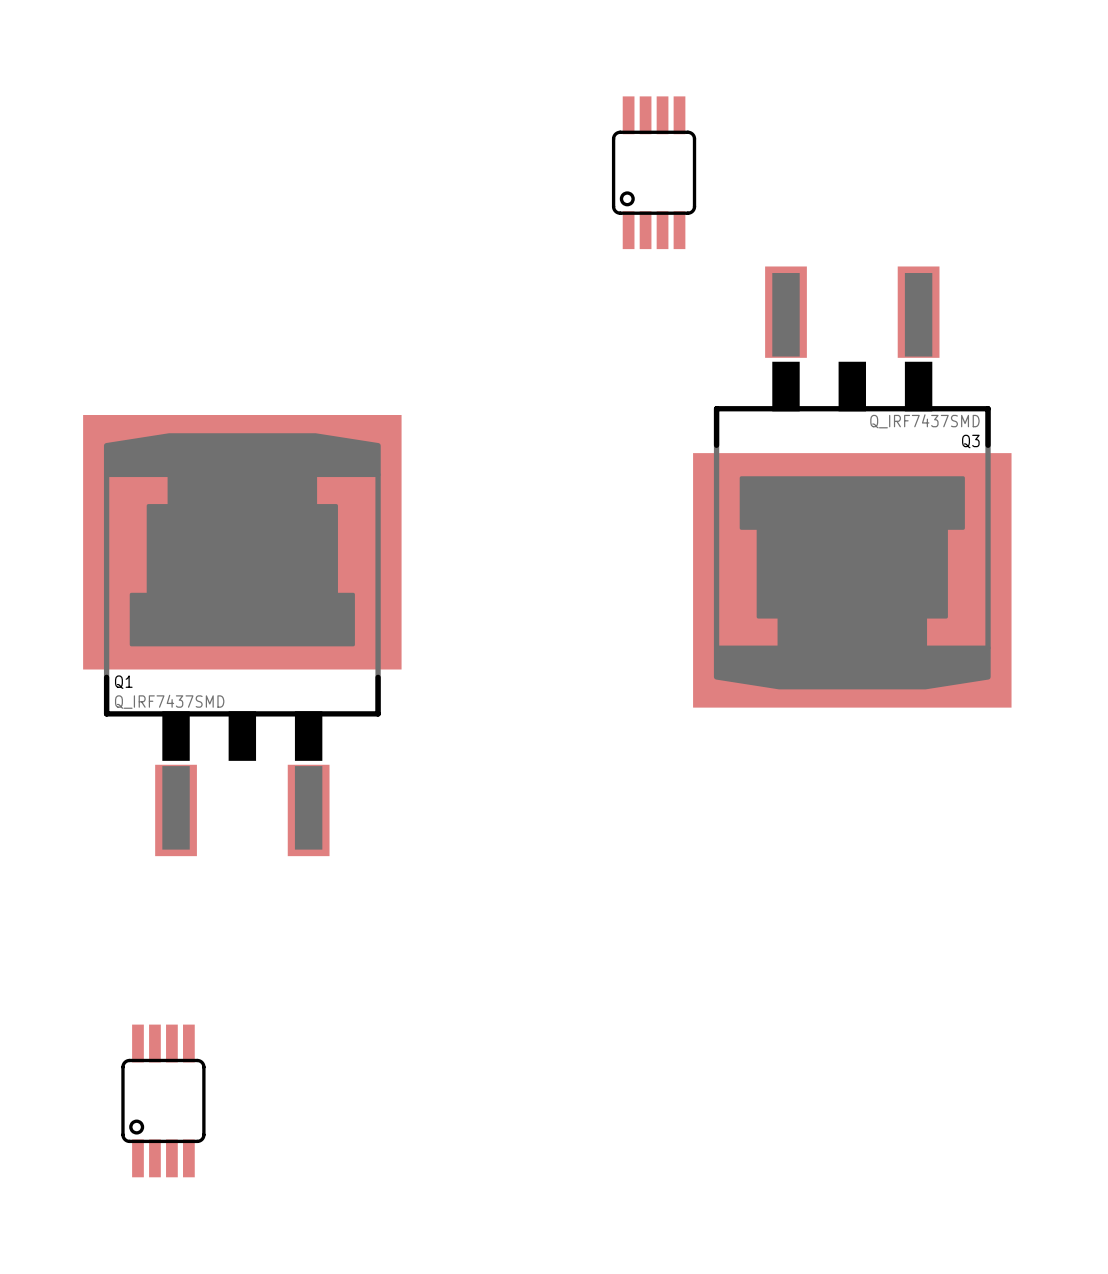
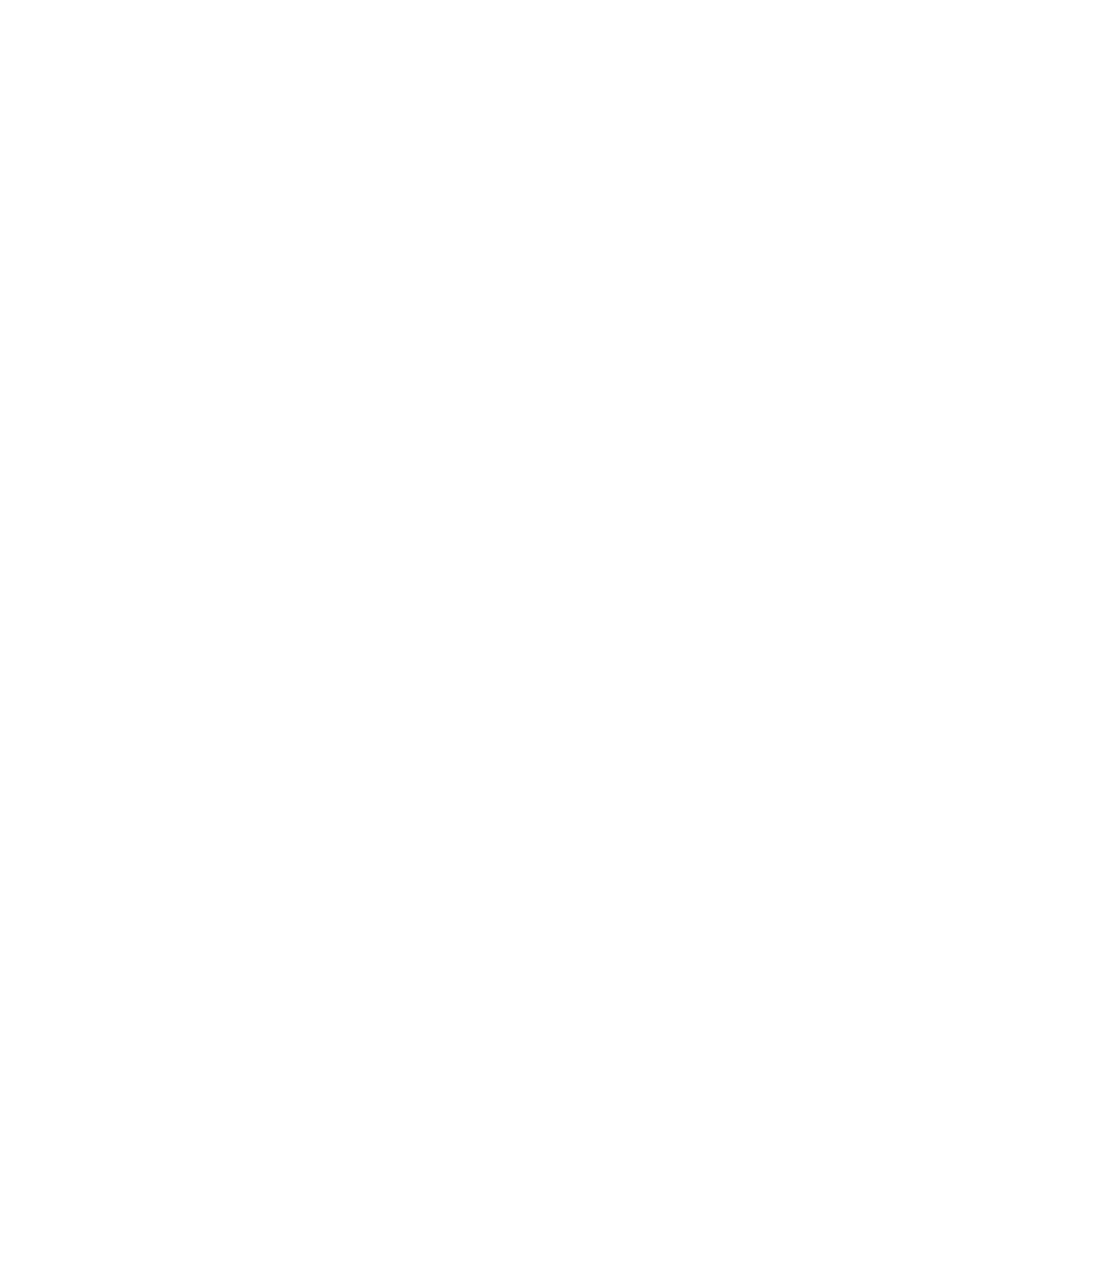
part: (654, 172) -> none
Q3: Q_IRF7437SMD (852, 487) -> none
Q1: Q_IRF7437SMD (242, 635) -> none
part: (163, 1100) -> none

